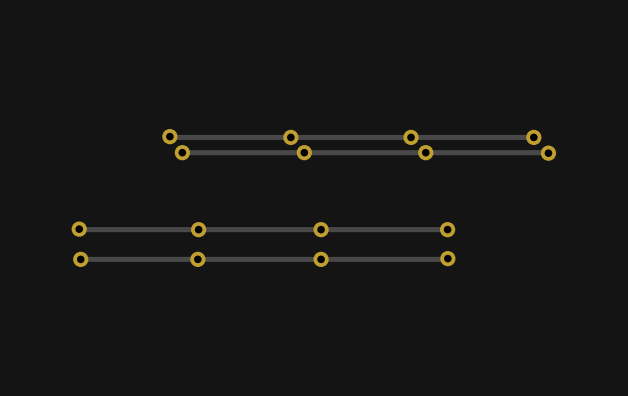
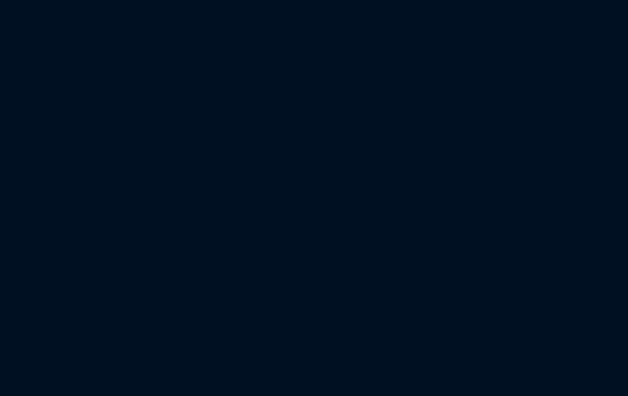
track: (169, 136) (533, 137) -> none
via: (169, 136) -> none
via: (290, 137) -> none
via: (411, 137) -> none
via: (533, 137) -> none
track: (182, 152) (548, 153) -> none
via: (182, 152) -> none
via: (304, 152) -> none
via: (425, 152) -> none
via: (548, 153) -> none
track: (79, 229) (447, 229) -> none
via: (79, 229) -> none
via: (198, 229) -> none
via: (321, 229) -> none
via: (447, 229) -> none
track: (447, 258) (80, 259) -> none
via: (447, 258) -> none
via: (80, 259) -> none
via: (197, 259) -> none
via: (321, 259) -> none

